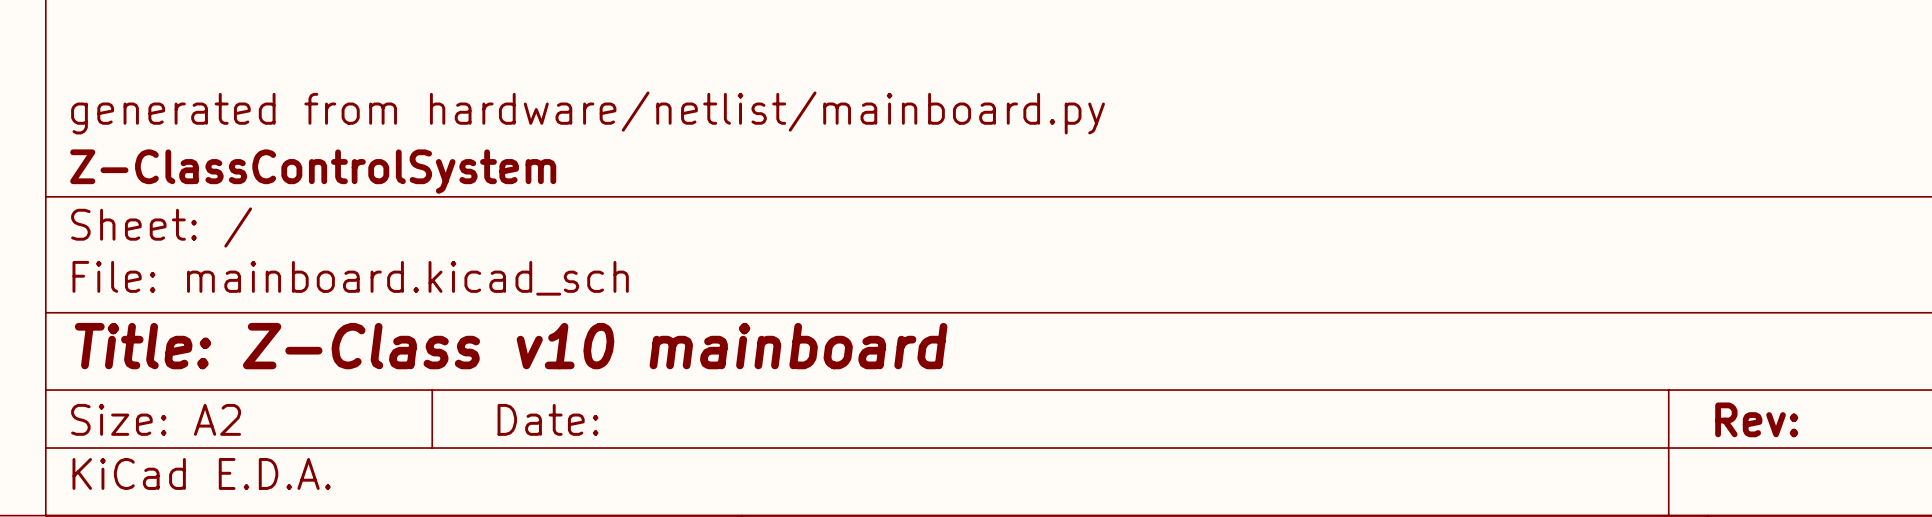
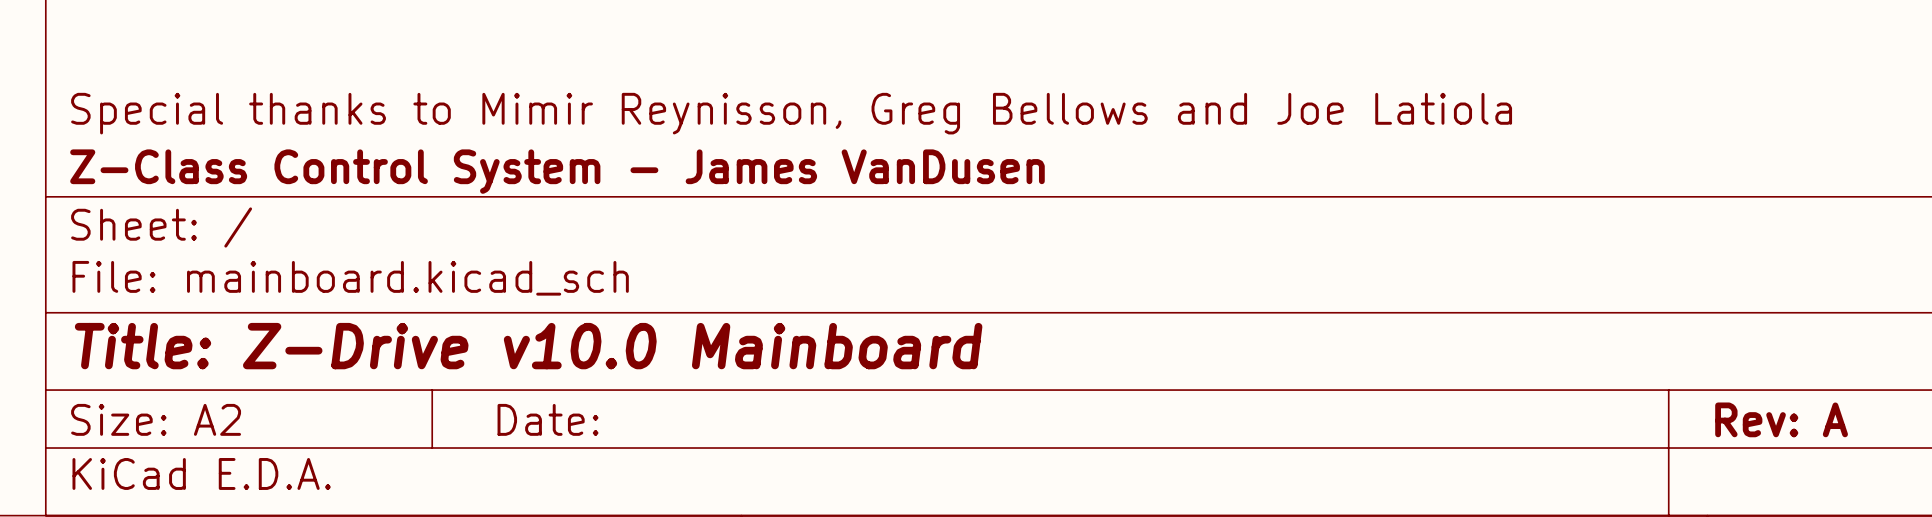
title block: generated from hardware/netlist/mainboard.py (588, 112) -> Special thanks to Mimir Reynisson, Greg Bellows and Joe Latiola (791, 113)
title block: Z-ClassControlSystem (313, 171) -> Z-Class Control System - James VanDusen (557, 171)
title block: Title: Z-Class v10 mainboard (511, 346) -> Title: Z-Drive v10.0 Mainboard (528, 346)
title block: Rev: (1756, 419) -> Rev: A (1781, 419)

